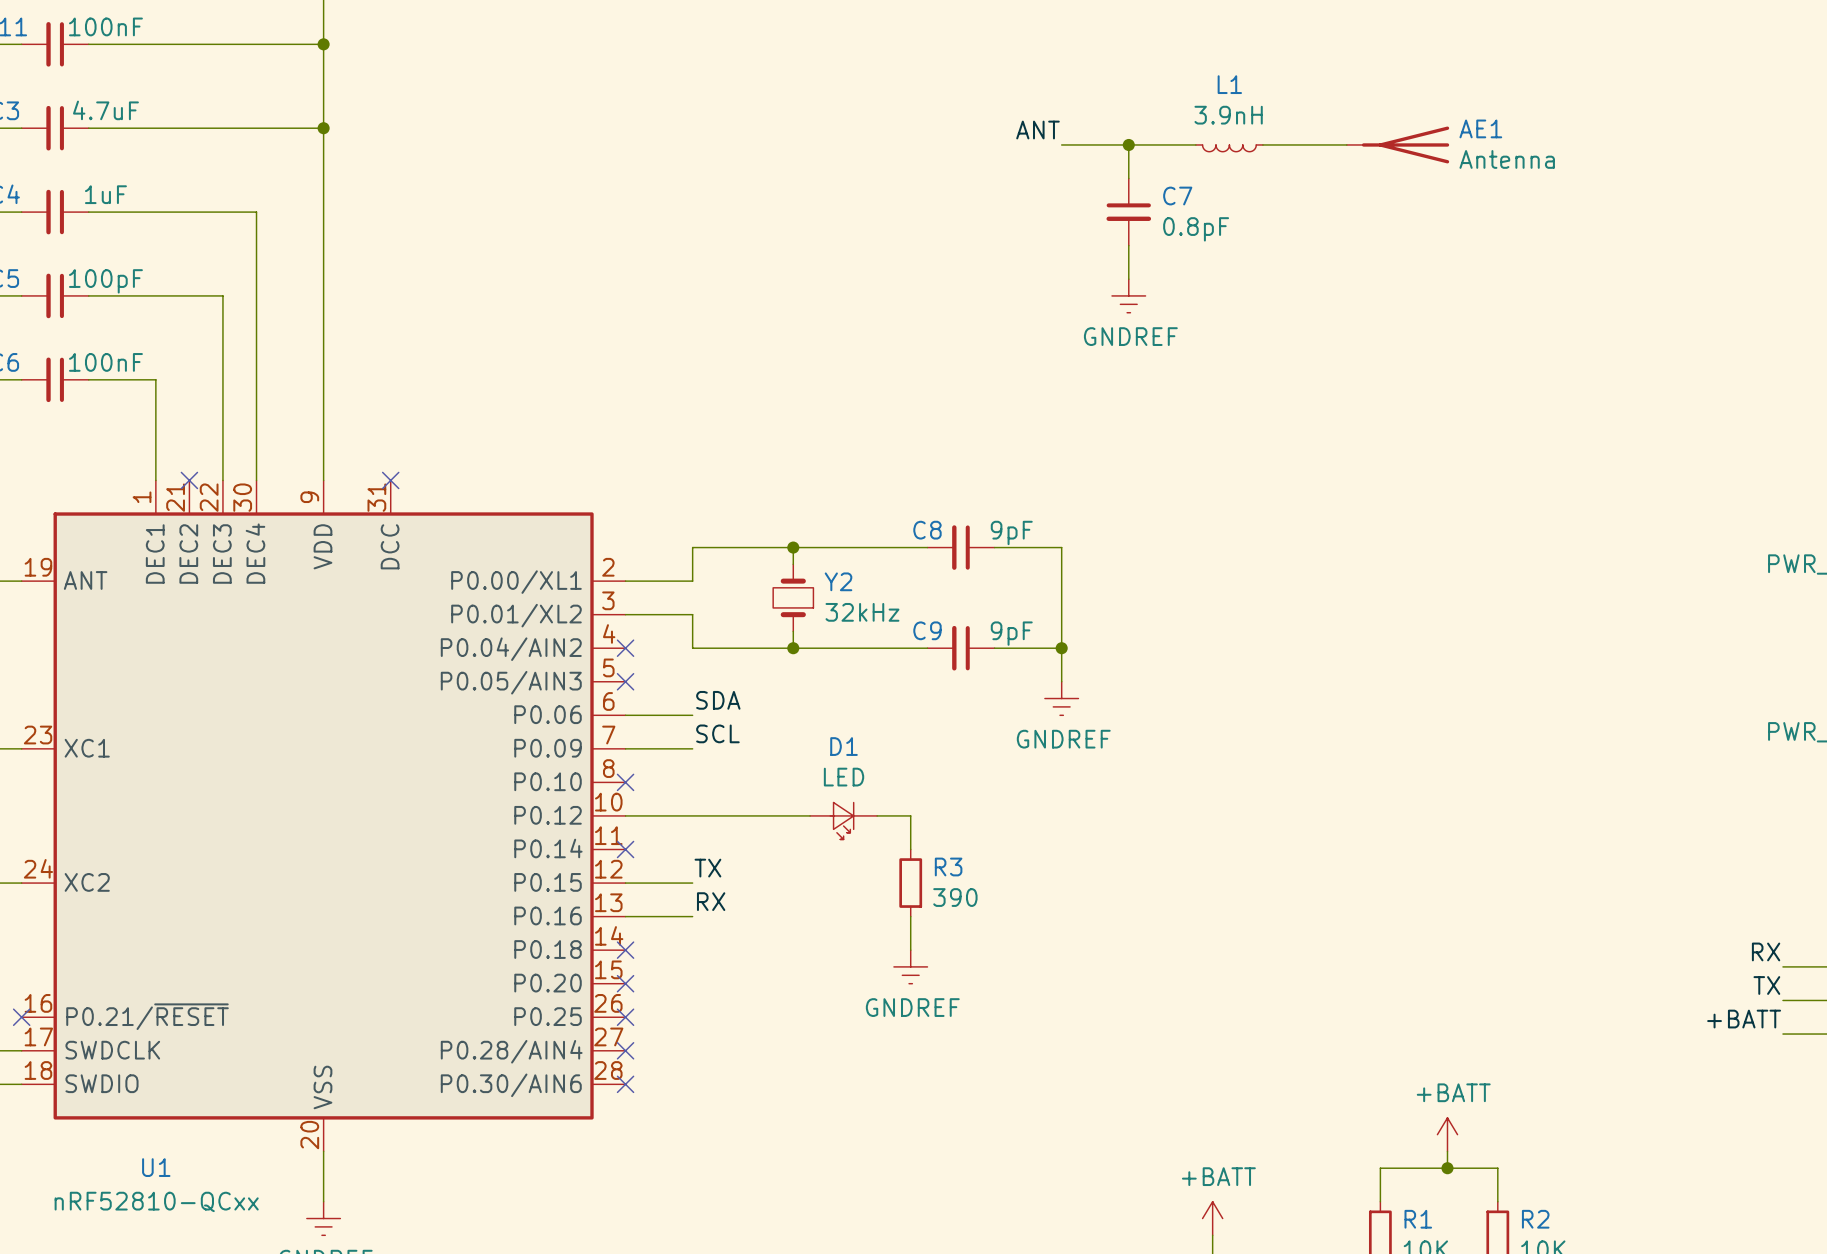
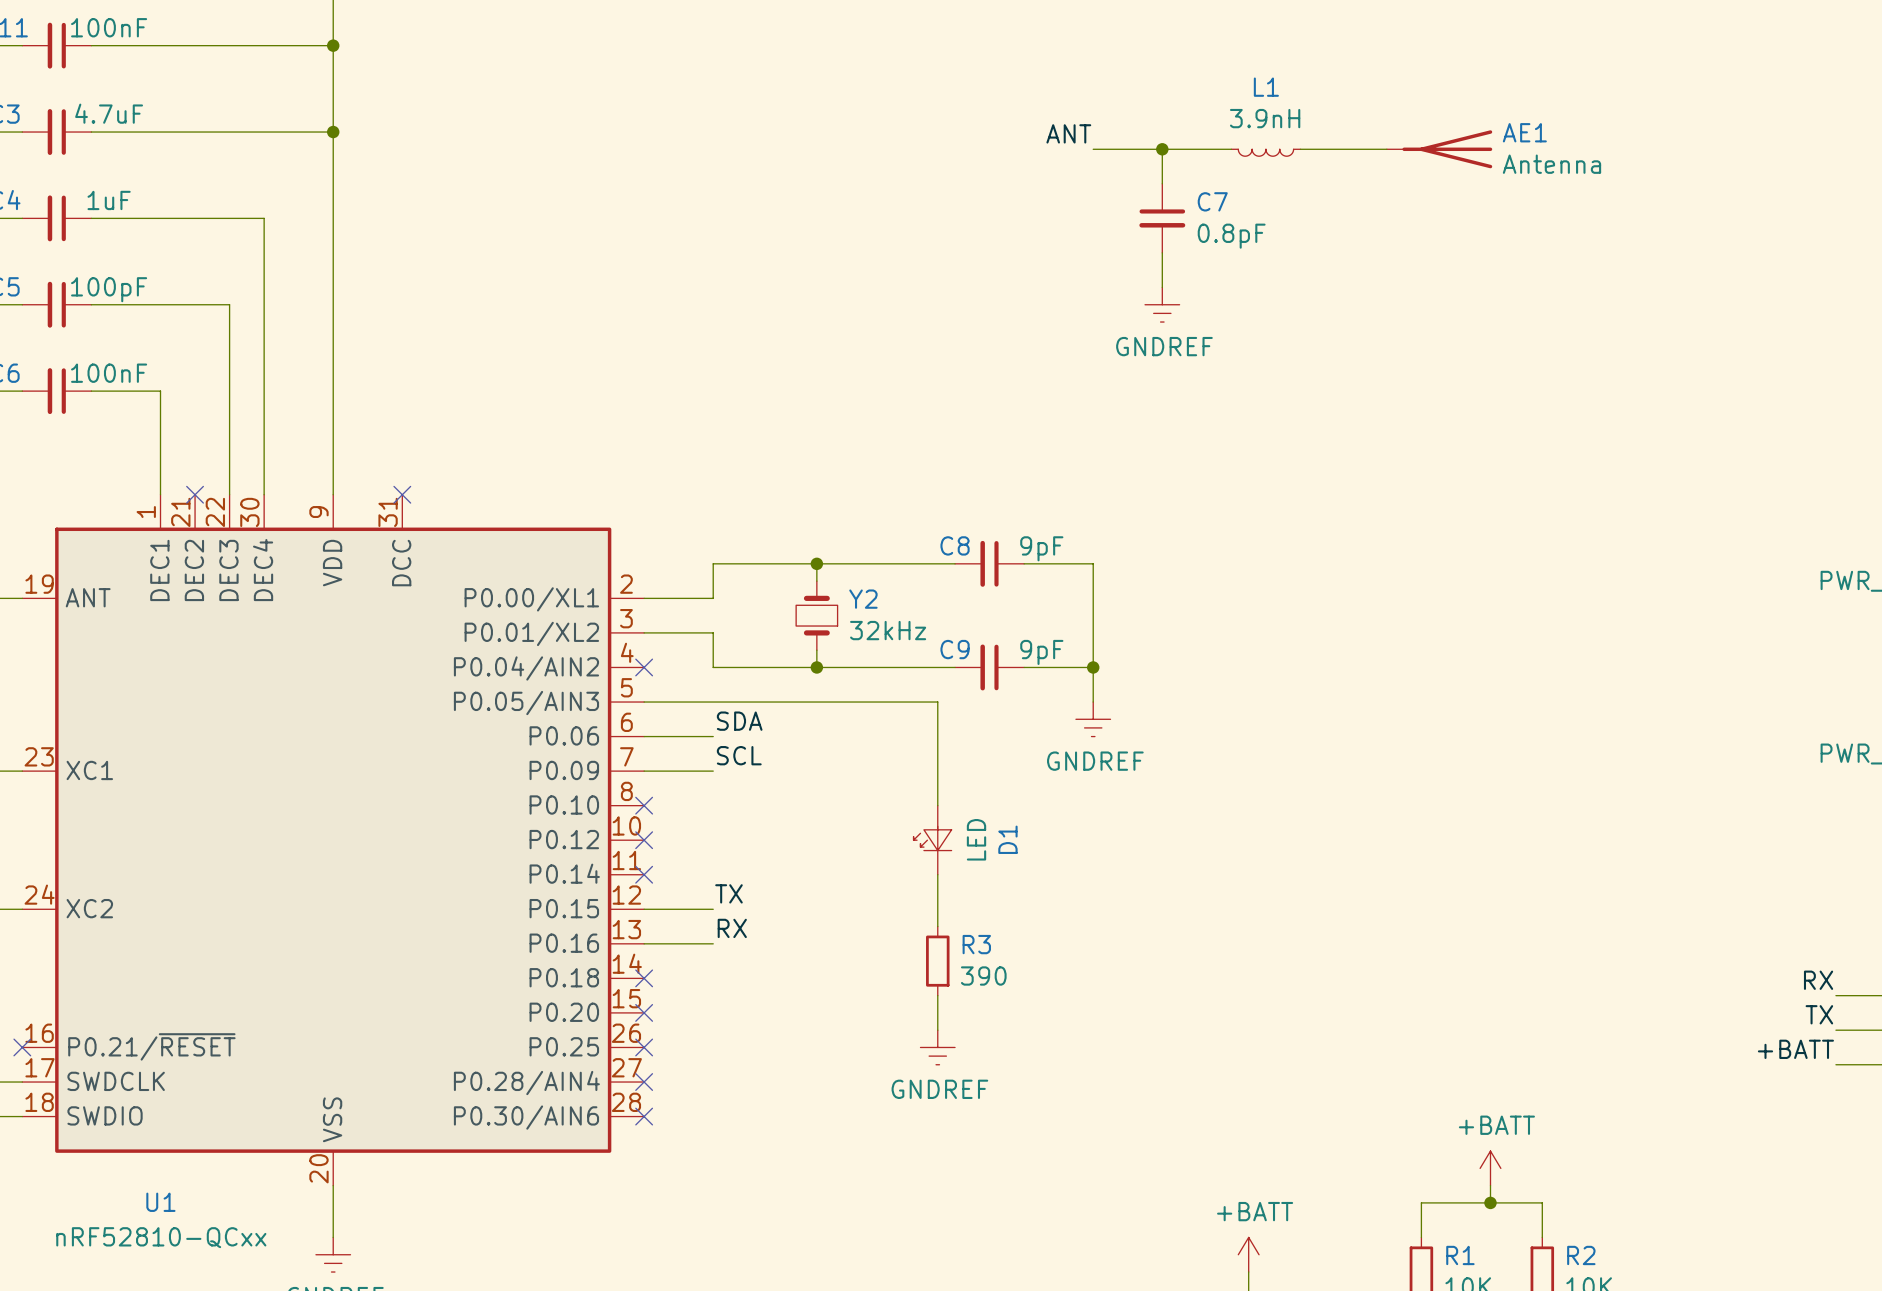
wire: none -> (644, 702) (937, 702) (937, 805)
no-connect mark: (625, 681) -> none
wire: (625, 815) (810, 815) -> none
no-connect mark: none -> (644, 840)
wire: (877, 815) (910, 815) (910, 849) -> (937, 926) (937, 874)
D1 rotation: 0° (841, 820) -> 90° clockwise (932, 838)
D1 position: (843, 820) -> (932, 840)
R3 position: (910, 883) -> (937, 961)
wire: (910, 916) (910, 950) -> (937, 995) (937, 1030)
power symbol position: GNDREF (910, 966) -> GNDREF (937, 1047)

